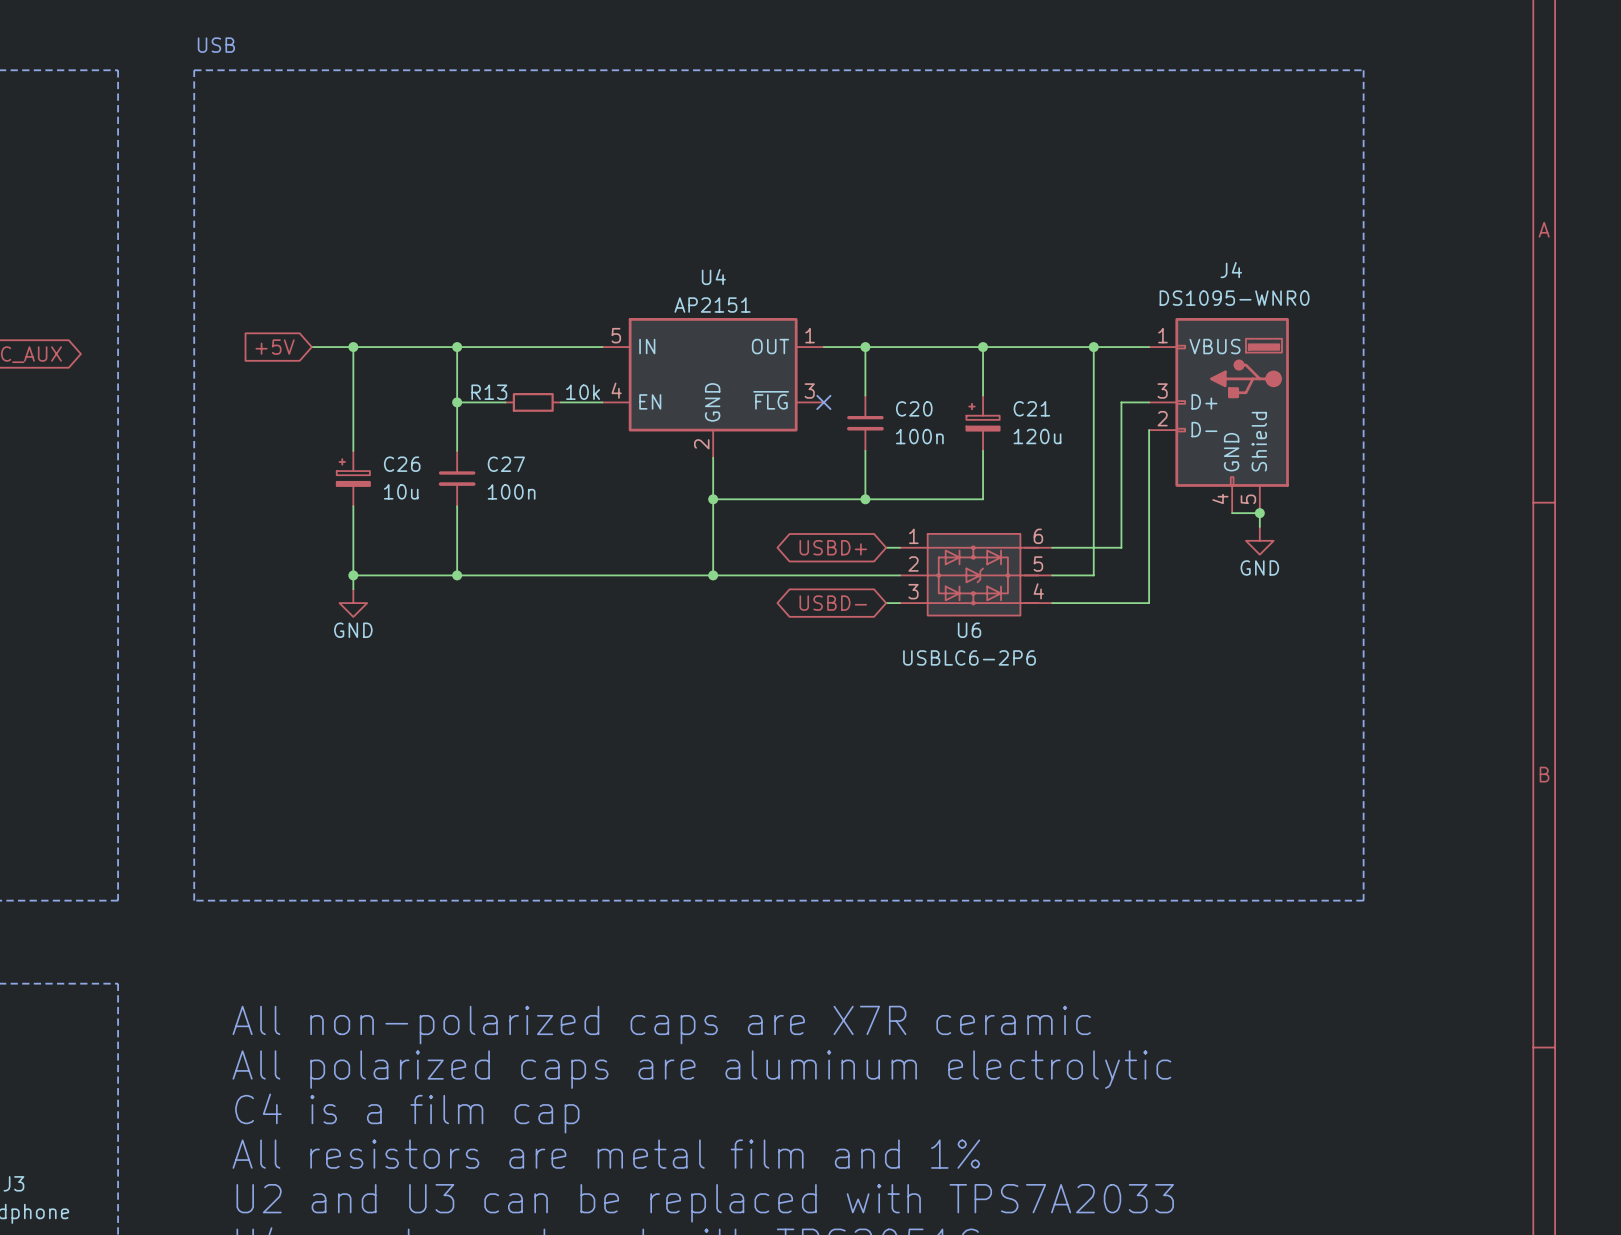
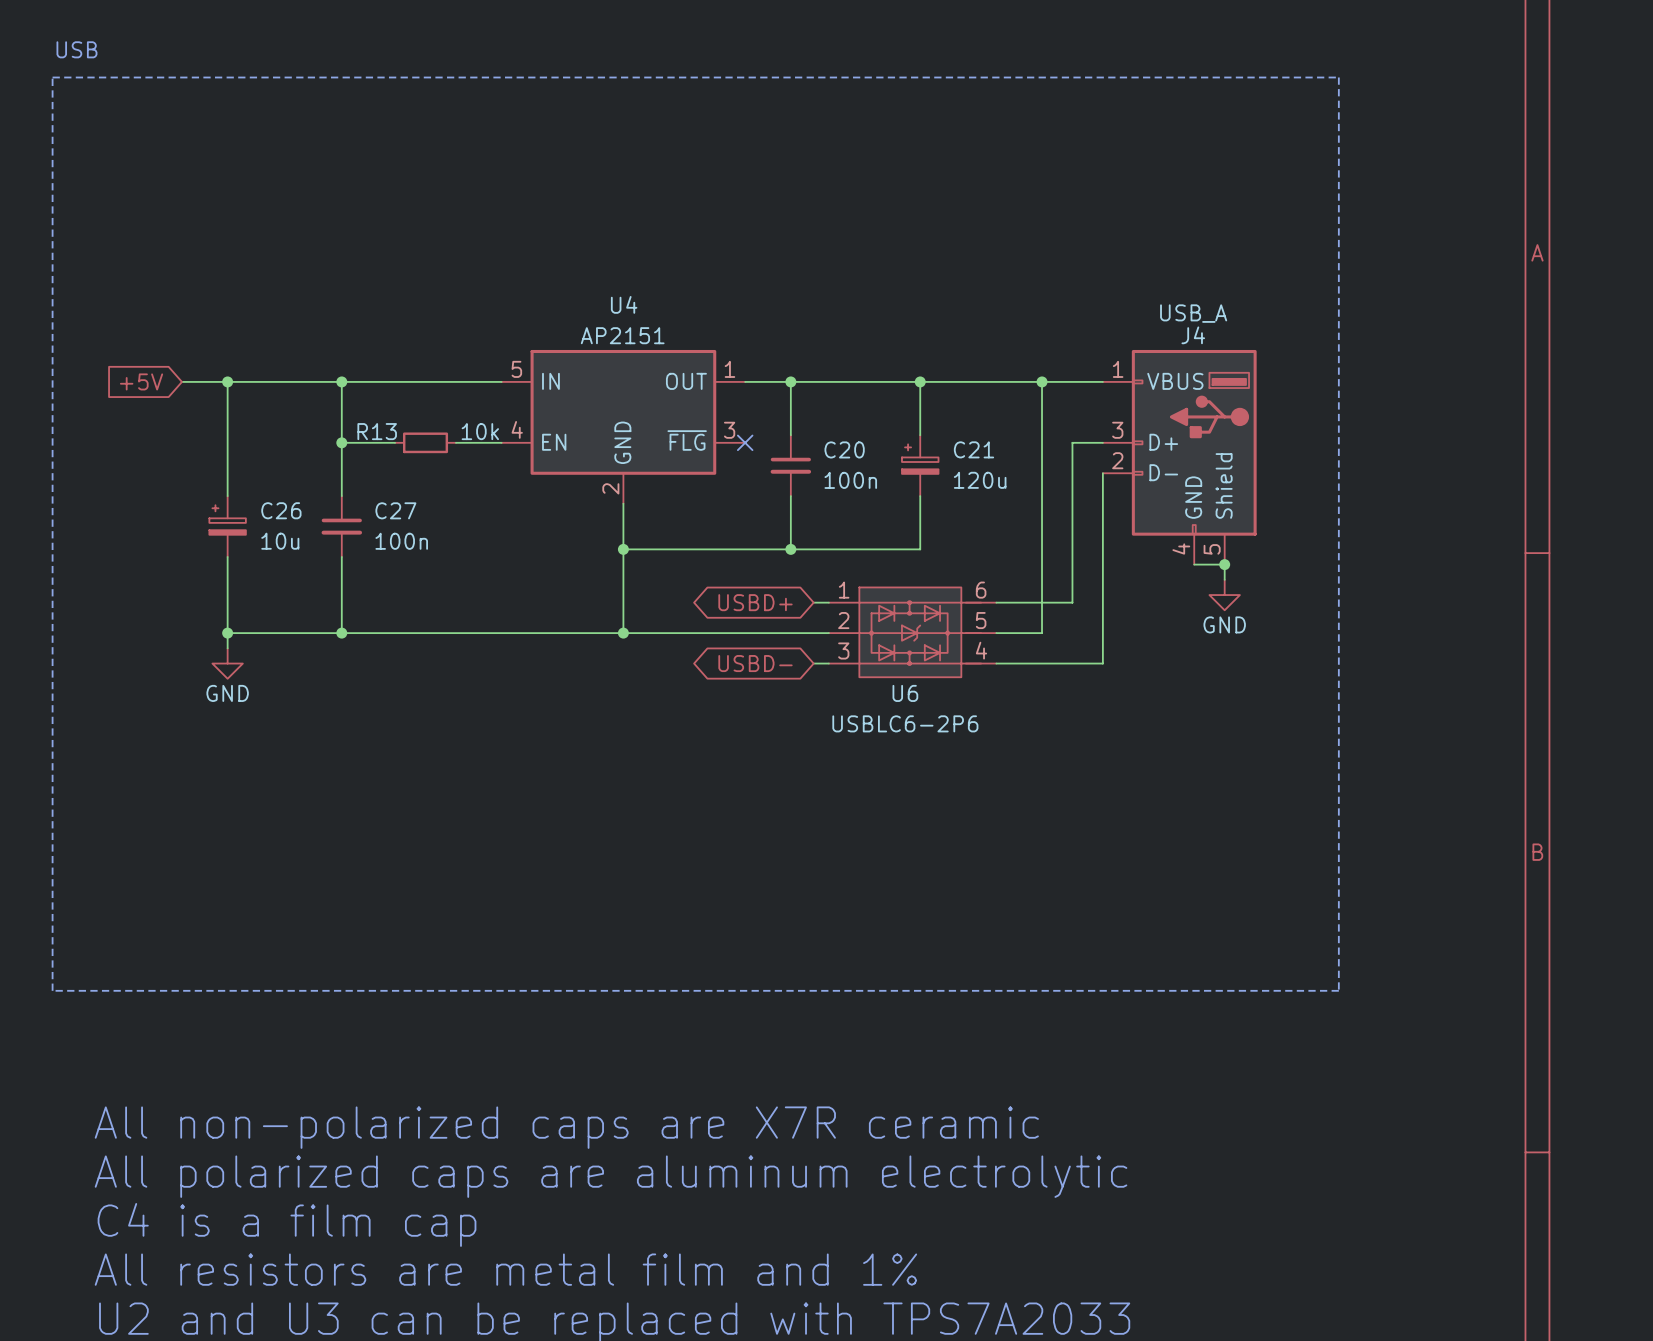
J4 name position: J4 (1231, 270) -> J4 (1193, 335)
J4 value: DS1095-WNR0 (1234, 298) -> USB_A (1193, 313)

